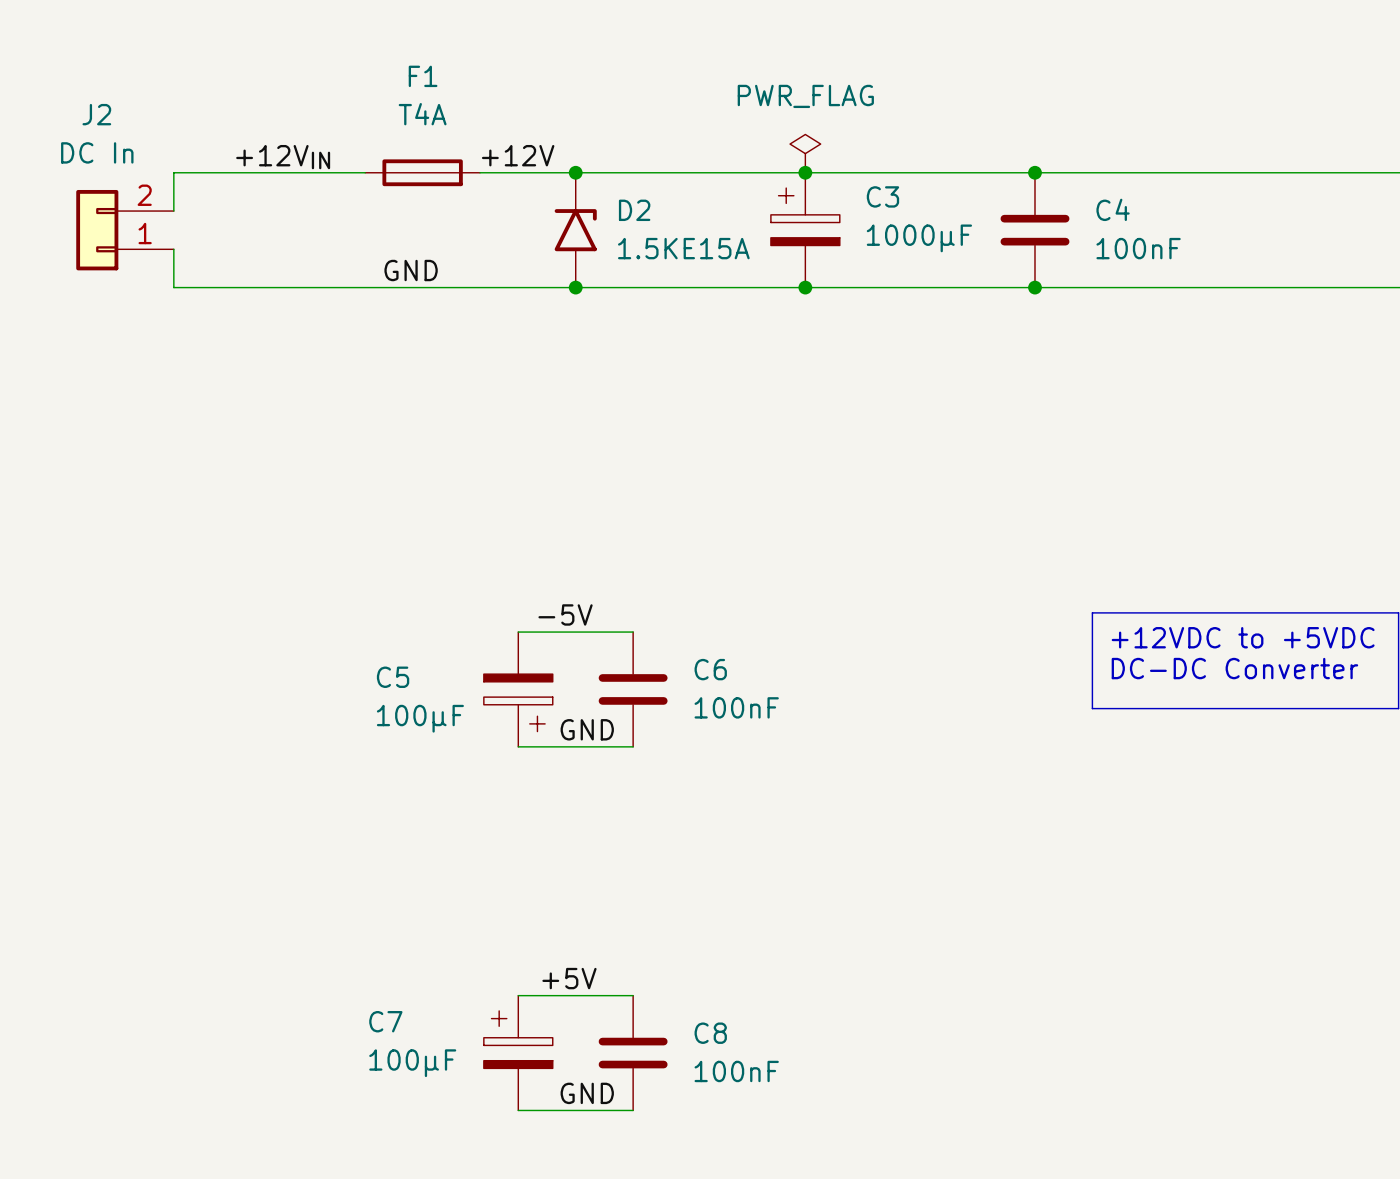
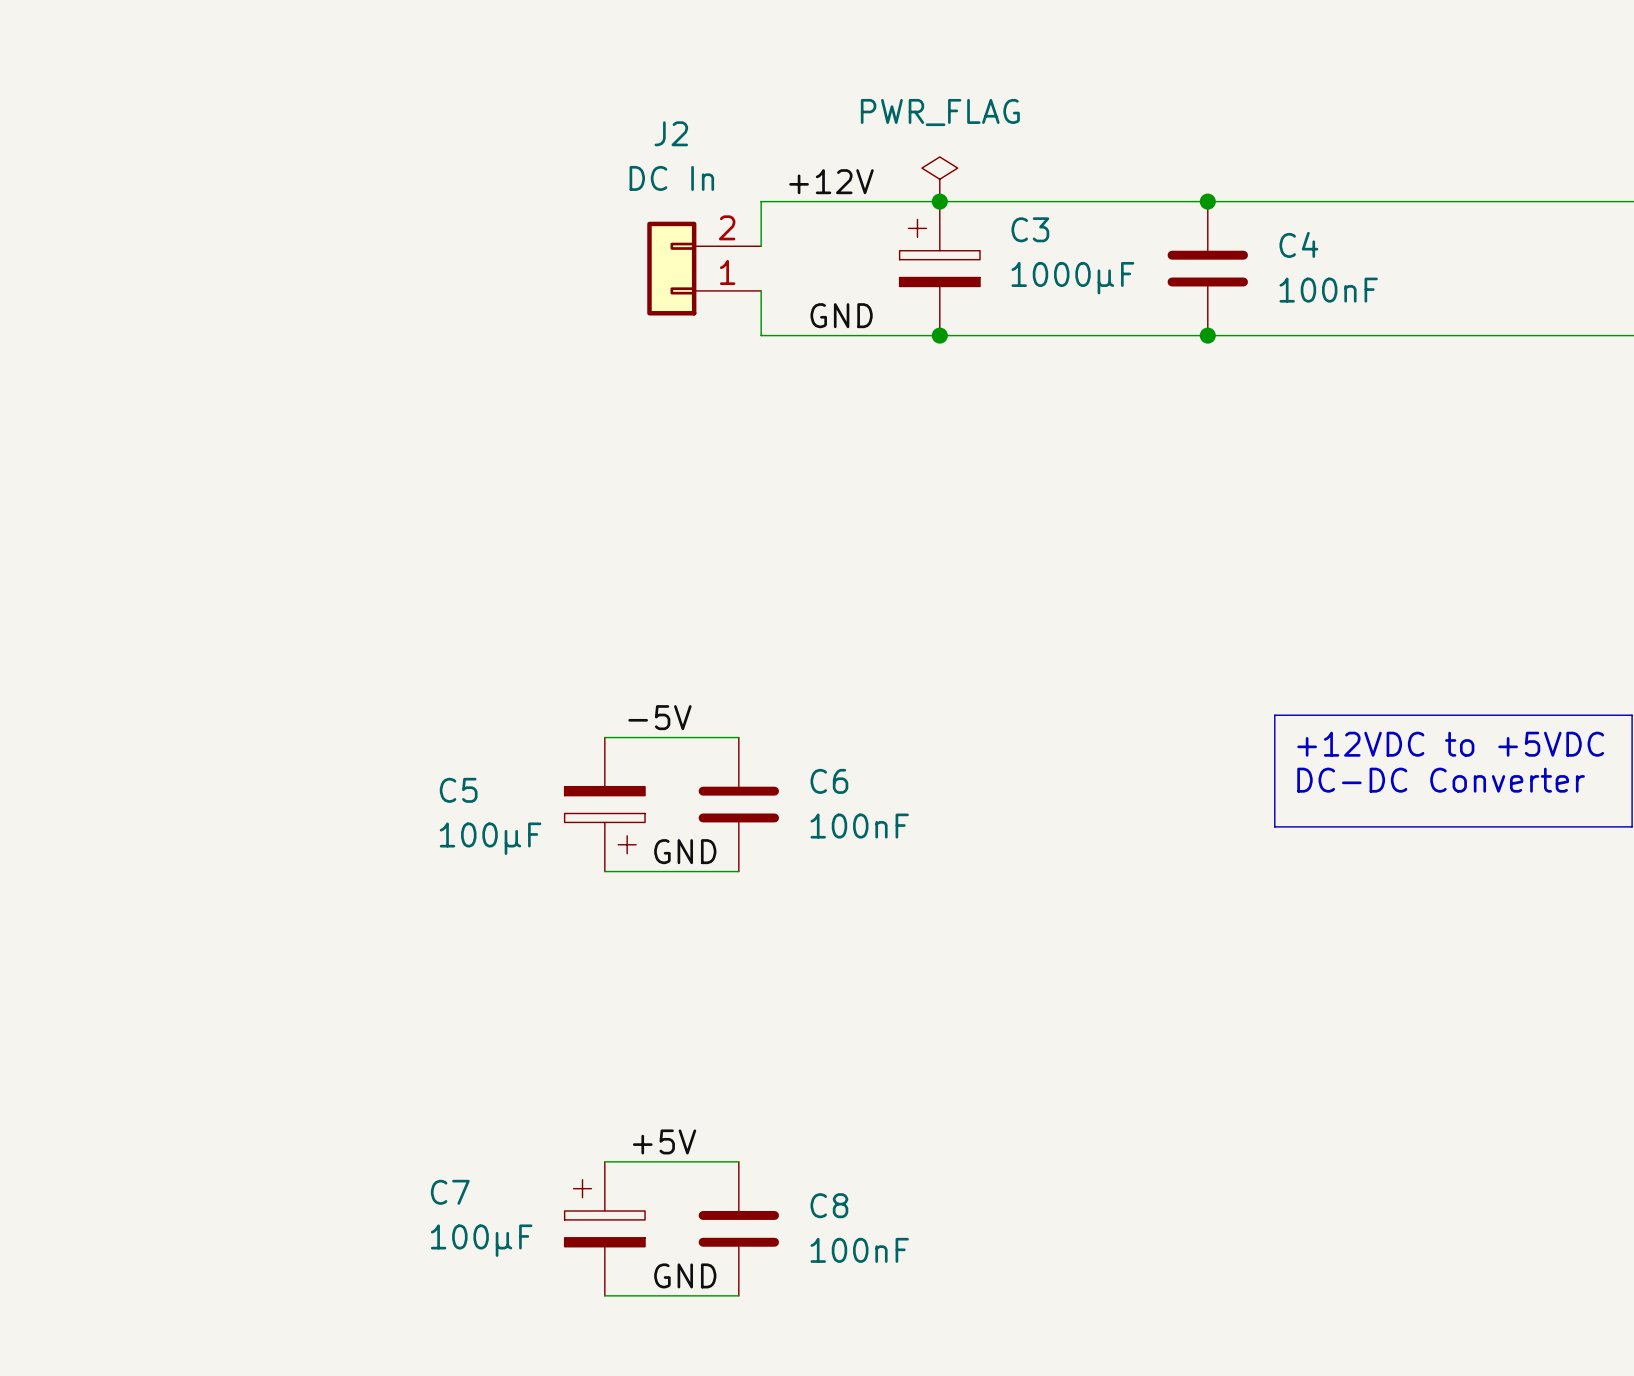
label position: +12V (518, 155) -> +12V (831, 181)
label: +12VIN (283, 157) -> none
wire: (365, 172) (173, 172) (173, 211) -> none
F1: T4A (422, 172) -> none
wire: (480, 172) (652, 172) -> (761, 246) (761, 201)
junction: (575, 172) -> none
J2 position: (125, 230) -> (704, 268)
D2: 1.5KE15A (575, 230) -> none
wire: (173, 249) (173, 287) (652, 287) -> (761, 290) (761, 335)
label position: GND (411, 270) -> GND (841, 315)
junction: (575, 287) -> none

